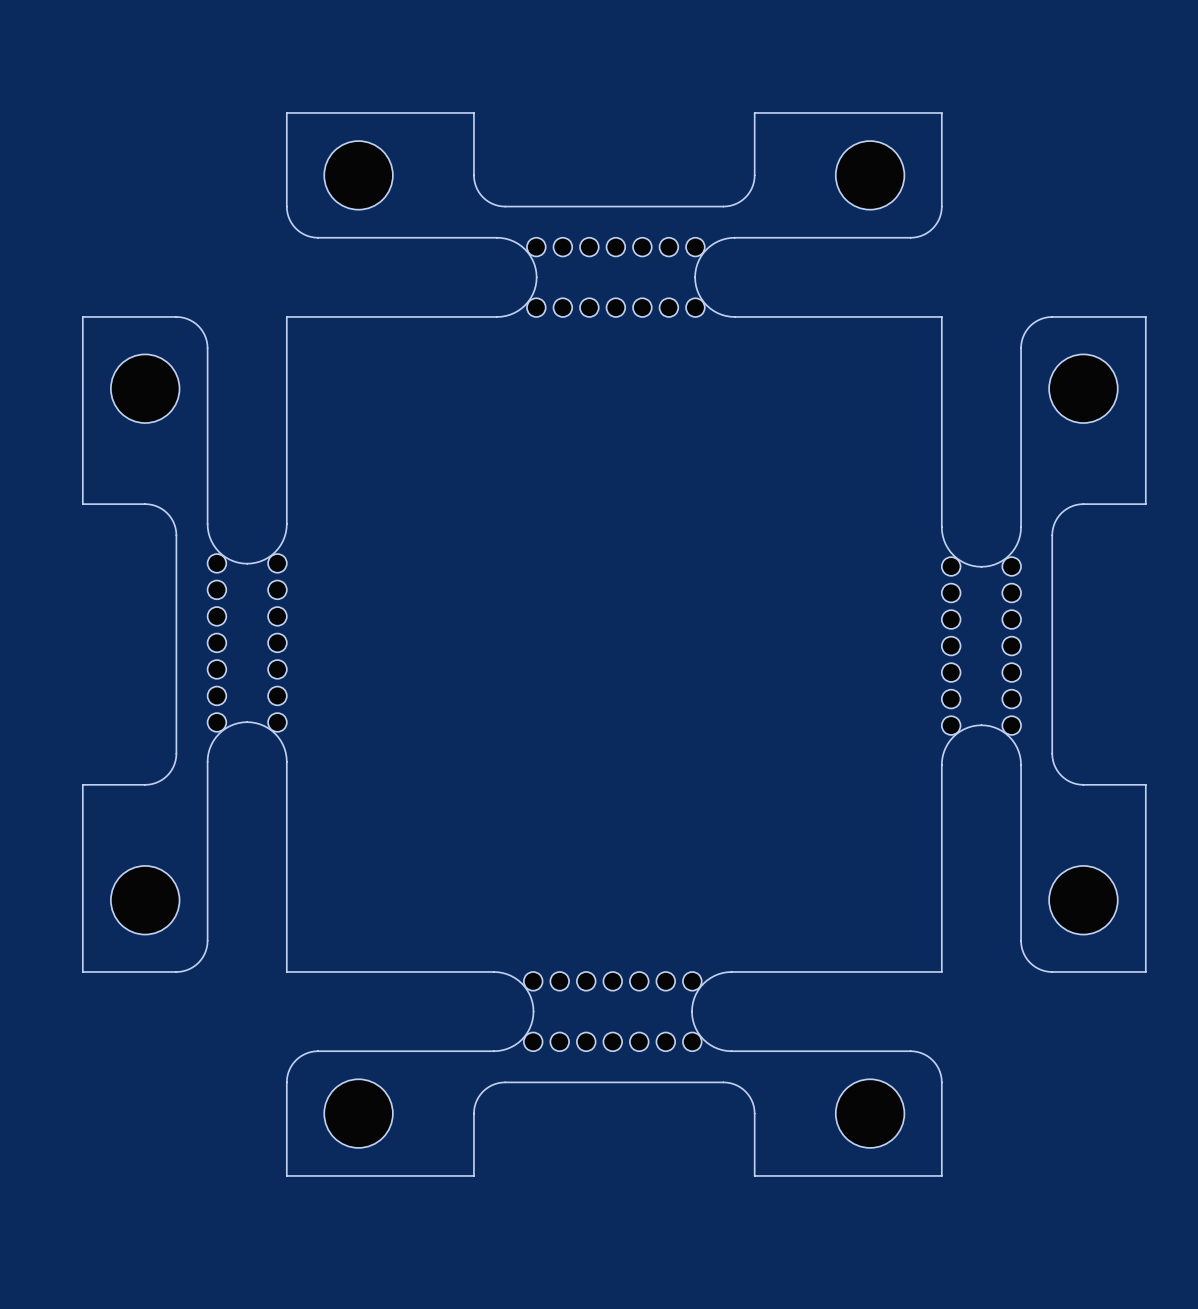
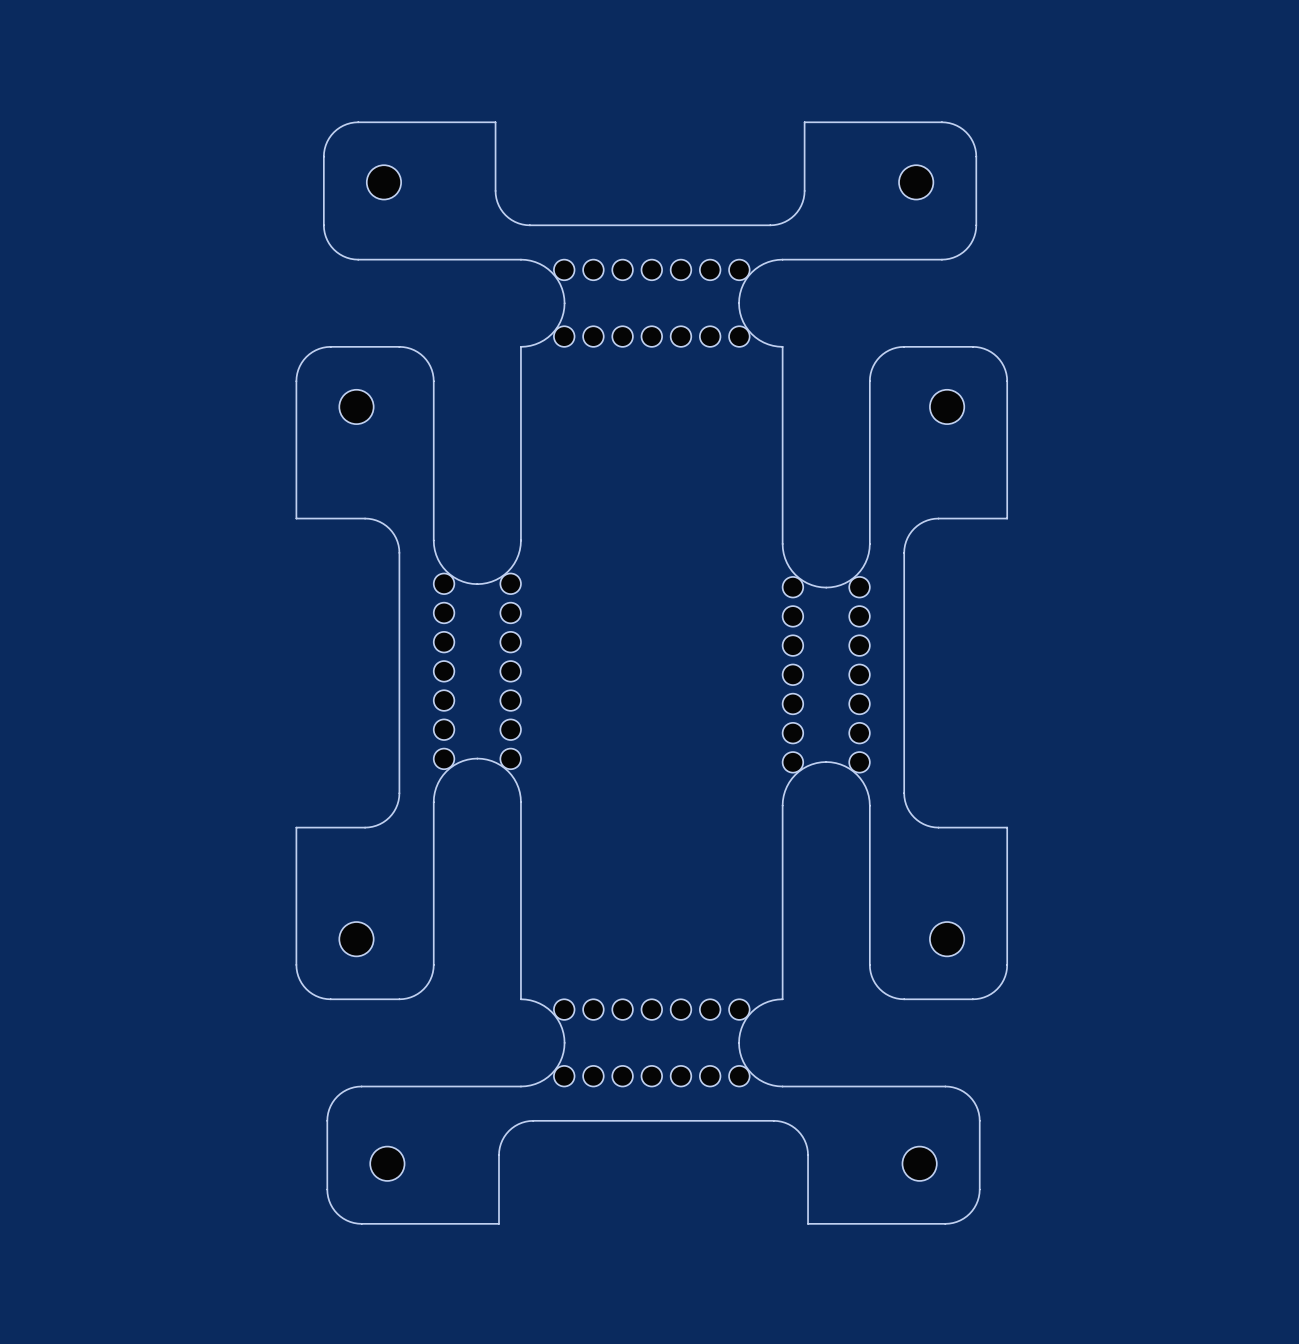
part: (358, 175) -> none
part: (870, 175) -> none
part: none -> (383, 182)
part: none -> (916, 182)
board edge: (734, 237) (910, 237) (927, 232) (937, 223) (941, 210) (941, 112) (754, 112) (754, 175) (752, 185) (742, 199) (733, 204) (723, 206) (498, 205) (483, 197) (474, 182) (473, 112) (286, 112) (287, 210) (291, 223) (301, 232) (318, 237) (497, 237) -> none
part position: (615, 277) -> (651, 303)
board edge: none -> (782, 259) (941, 259) (960, 254) (971, 243) (976, 229) (976, 156) (971, 138) (960, 127) (945, 122) (804, 122) (804, 190) (802, 202) (797, 212) (788, 220) (770, 225) (529, 225) (518, 223) (505, 215) (496, 198) (495, 122) (354, 122) (339, 127) (329, 138) (323, 156) (324, 229) (329, 243) (339, 254) (358, 259) (520, 259)
board edge: (497, 316) (286, 316) (286, 524) -> none
board edge: (734, 316) (941, 316) (941, 527) -> none
board edge: none -> (520, 346) (520, 540)
board edge: none -> (782, 346) (782, 543)
part: (145, 388) -> none
part: (1083, 388) -> none
part: none -> (356, 406)
part: none -> (947, 406)
board edge: (207, 524) (207, 348) (202, 331) (192, 321) (179, 317) (82, 316) (82, 504) (145, 504) (155, 505) (164, 510) (171, 518) (176, 535) (175, 760) (167, 775) (152, 784) (82, 784) (82, 971) (179, 971) (192, 967) (202, 957) (207, 940) (207, 761) -> none
board edge: (1021, 527) (1021, 348) (1025, 331) (1035, 321) (1048, 317) (1145, 316) (1145, 504) (1083, 504) (1073, 505) (1063, 510) (1057, 518) (1052, 535) (1053, 760) (1061, 775) (1076, 784) (1145, 784) (1145, 971) (1048, 971) (1035, 967) (1025, 957) (1021, 940) (1021, 764) -> none
part position: (247, 642) -> (477, 671)
part position: (981, 646) -> (826, 674)
board edge: (286, 761) (286, 971) (321, 971) -> (433, 540) (433, 381) (428, 362) (417, 352) (403, 347) (330, 346) (312, 352) (301, 362) (296, 377) (296, 518) (365, 518) (376, 520) (391, 531) (397, 541) (399, 552) (399, 793) (397, 804) (386, 820) (372, 826) (296, 827) (297, 972) (301, 983) (309, 991) (319, 997) (330, 999)
board edge: (941, 764) (941, 971) (904, 971) -> (869, 543) (869, 381) (875, 362) (885, 352) (900, 347) (972, 346) (991, 352) (1001, 362) (1006, 377) (1007, 518) (938, 518) (927, 520) (911, 531) (906, 541) (904, 552) (904, 793) (906, 804) (917, 820) (930, 826) (1007, 827) (1006, 972) (1001, 983) (994, 991) (984, 997) (972, 999)
board edge: none -> (520, 802) (520, 999)
board edge: none -> (782, 805) (782, 999)
part: (145, 900) -> none
part: (1083, 900) -> none
part: none -> (356, 939)
part: none -> (947, 939)
board edge: (493, 971) (383, 971) -> (433, 802) (432, 972) (428, 983) (420, 991) (410, 997) (399, 999)
board edge: (842, 971) (731, 971) -> (904, 999) (892, 997) (882, 991) (875, 983) (870, 972) (869, 805)
board edge: (349, 1051) (314, 1051) (304, 1054) (291, 1065) (286, 1082) (286, 1175) (349, 1175) -> (361, 1086) (350, 1088) (337, 1096) (330, 1105) (327, 1120) (327, 1189) (329, 1200) (334, 1210) (343, 1218) (361, 1223)
board edge: (879, 1051) (914, 1051) (924, 1054) (937, 1065) (941, 1082) (941, 1175) (879, 1175) -> (945, 1086) (960, 1089) (969, 1096) (976, 1105) (979, 1120) (979, 1189) (977, 1200) (966, 1216) (956, 1221) (945, 1223)
part footprint: [324, 1079, 393, 1148] -> [370, 1146, 405, 1181]
part footprint: [835, 1079, 905, 1148] -> [902, 1146, 937, 1181]

